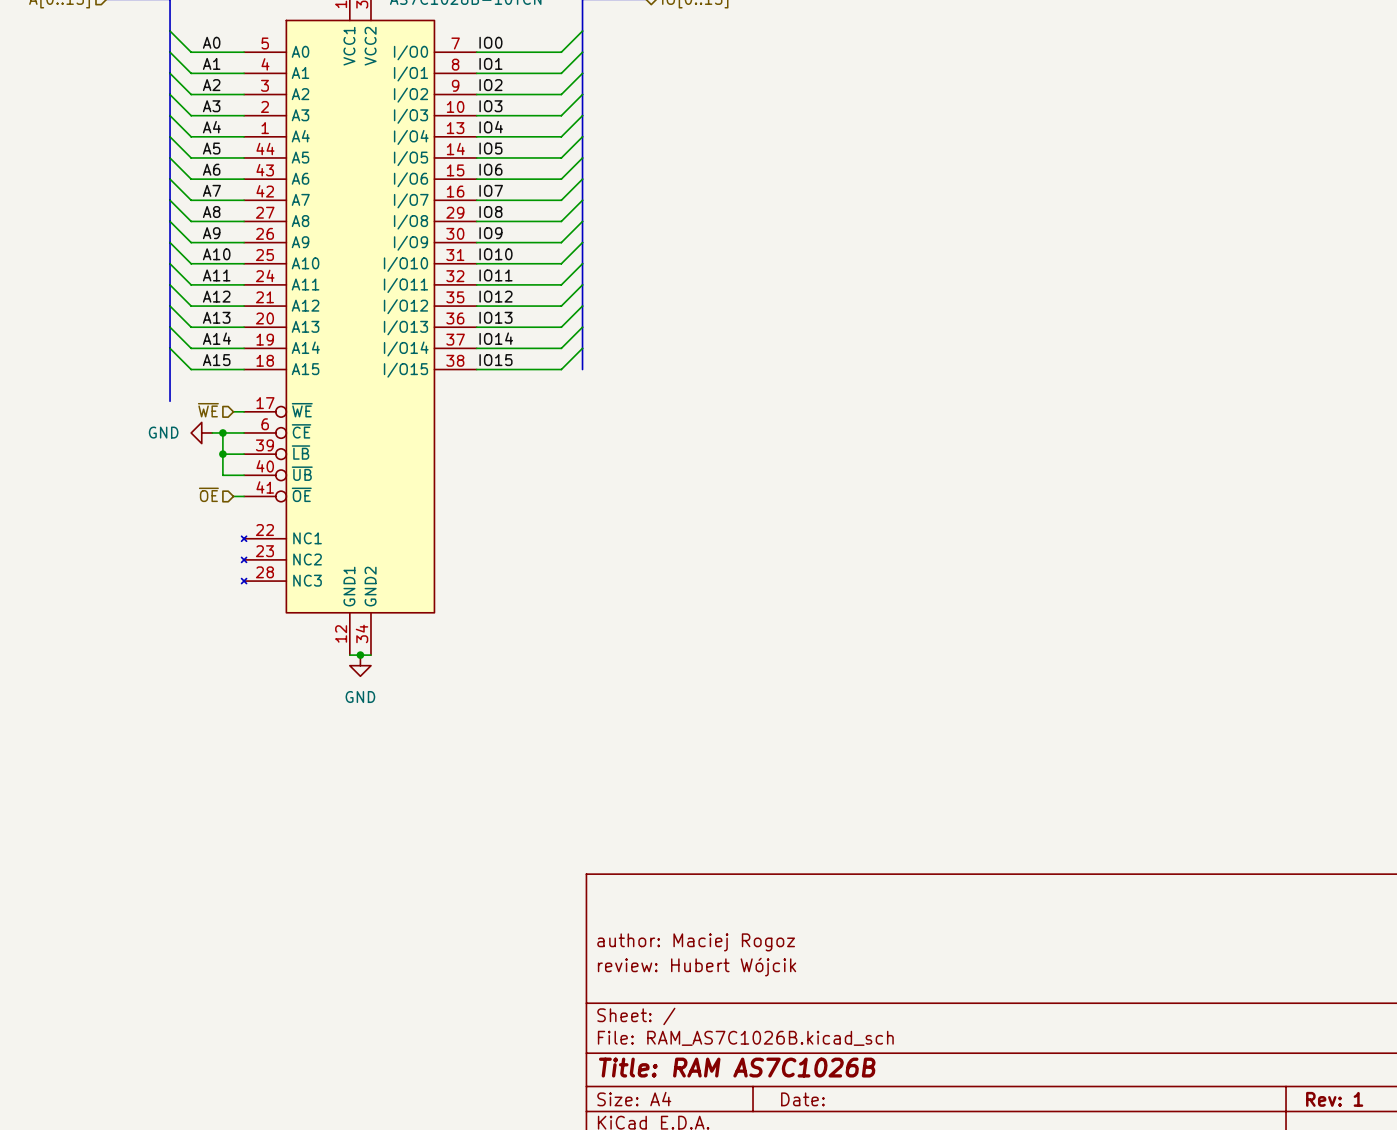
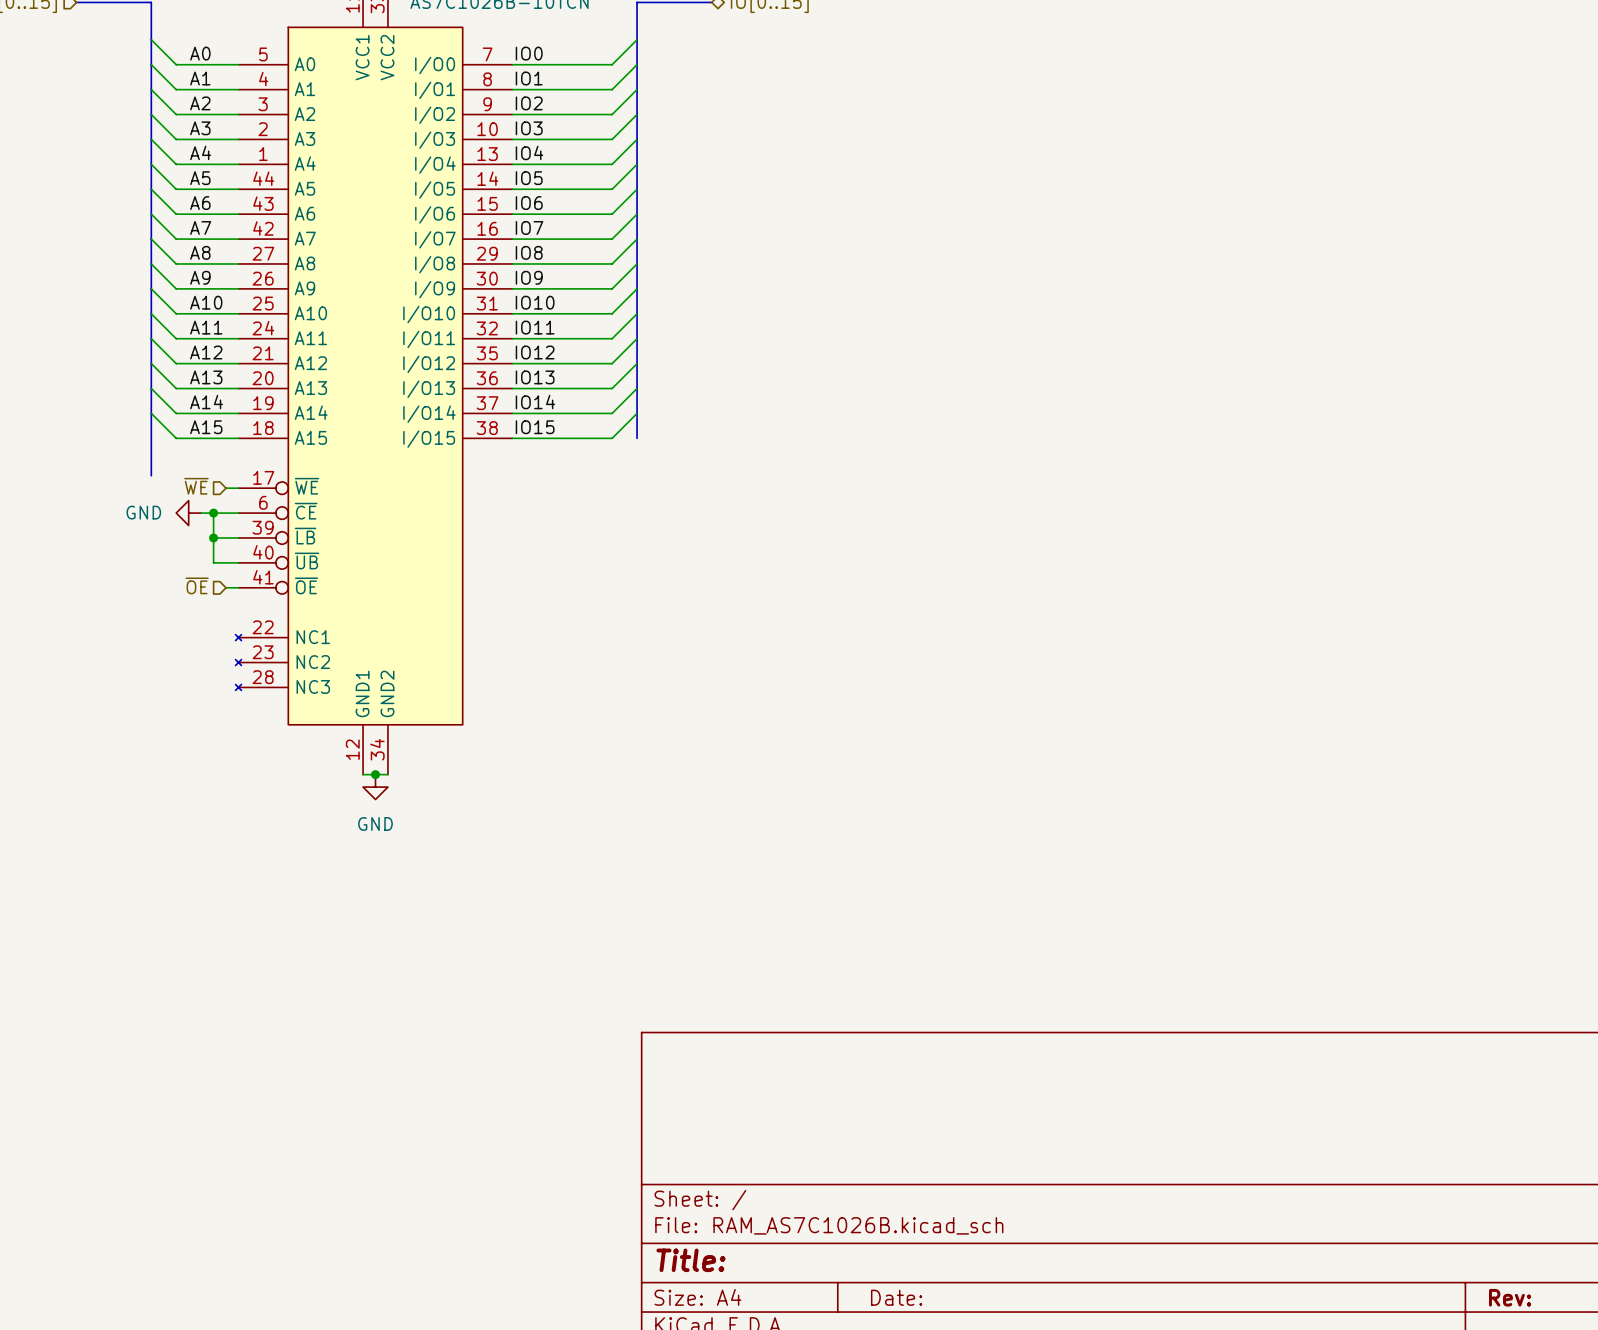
title block: author: Maciej Rogoz (696, 942) -> none
title block: review: Hubert Wójcik (697, 967) -> none
title block: Title: RAM AS7C1026B (737, 1067) -> Title: (690, 1260)
title block: Rev: 1 (1334, 1099) -> Rev: (1510, 1297)

